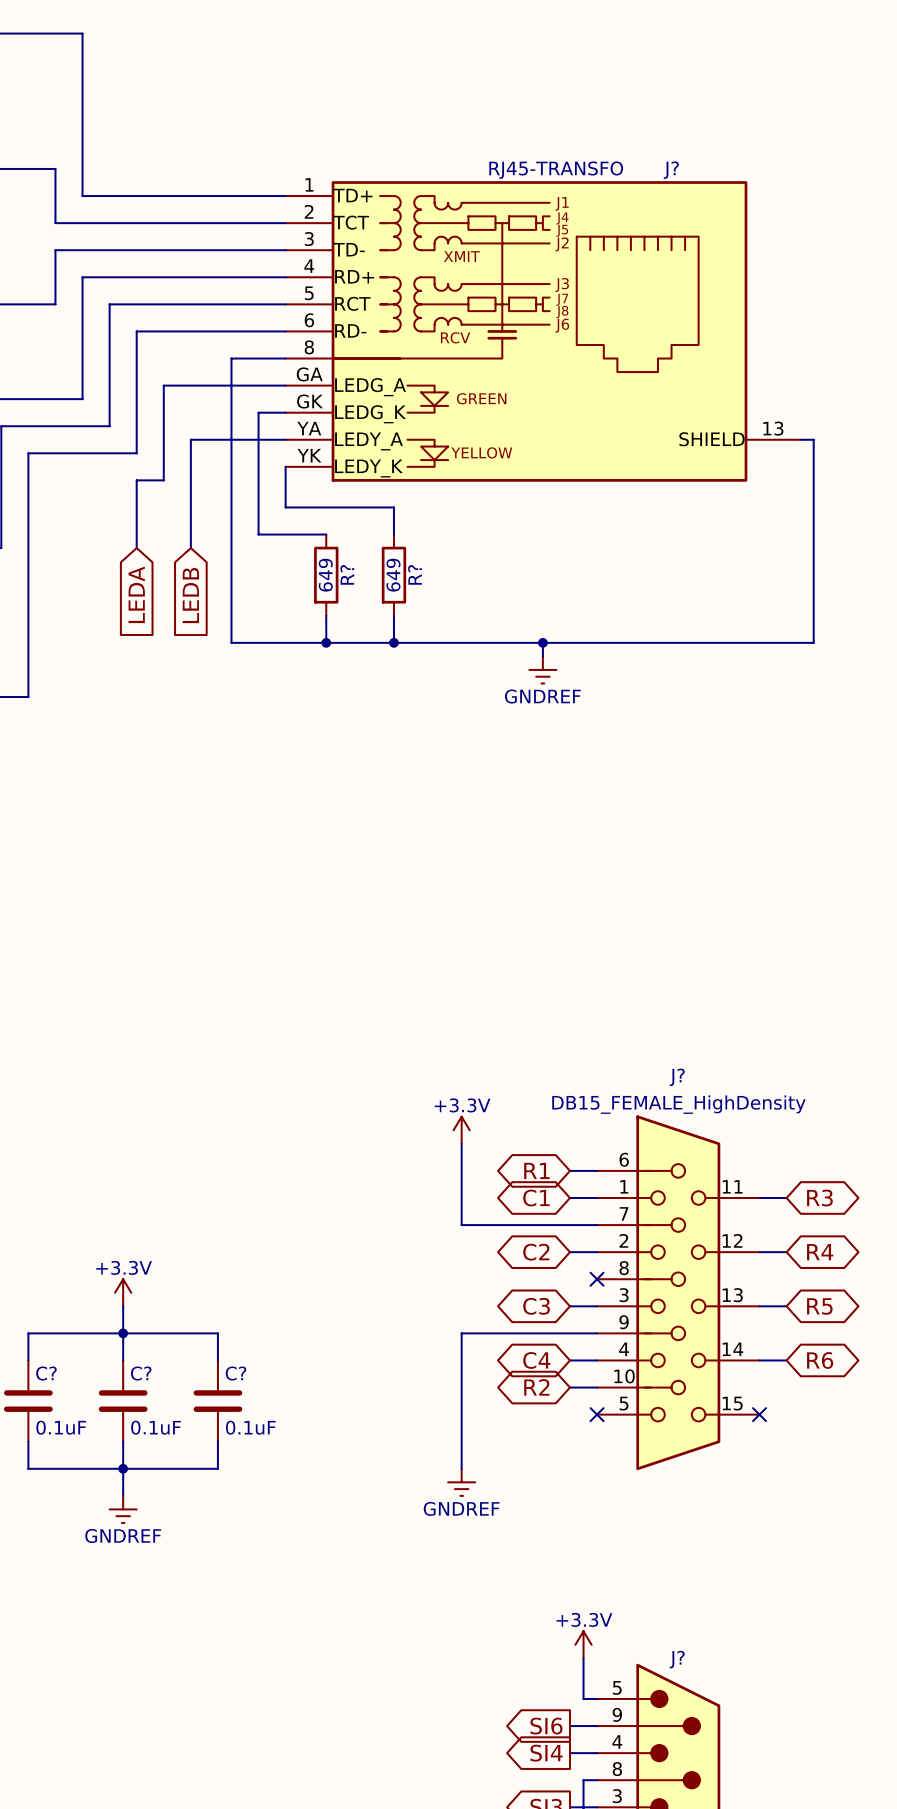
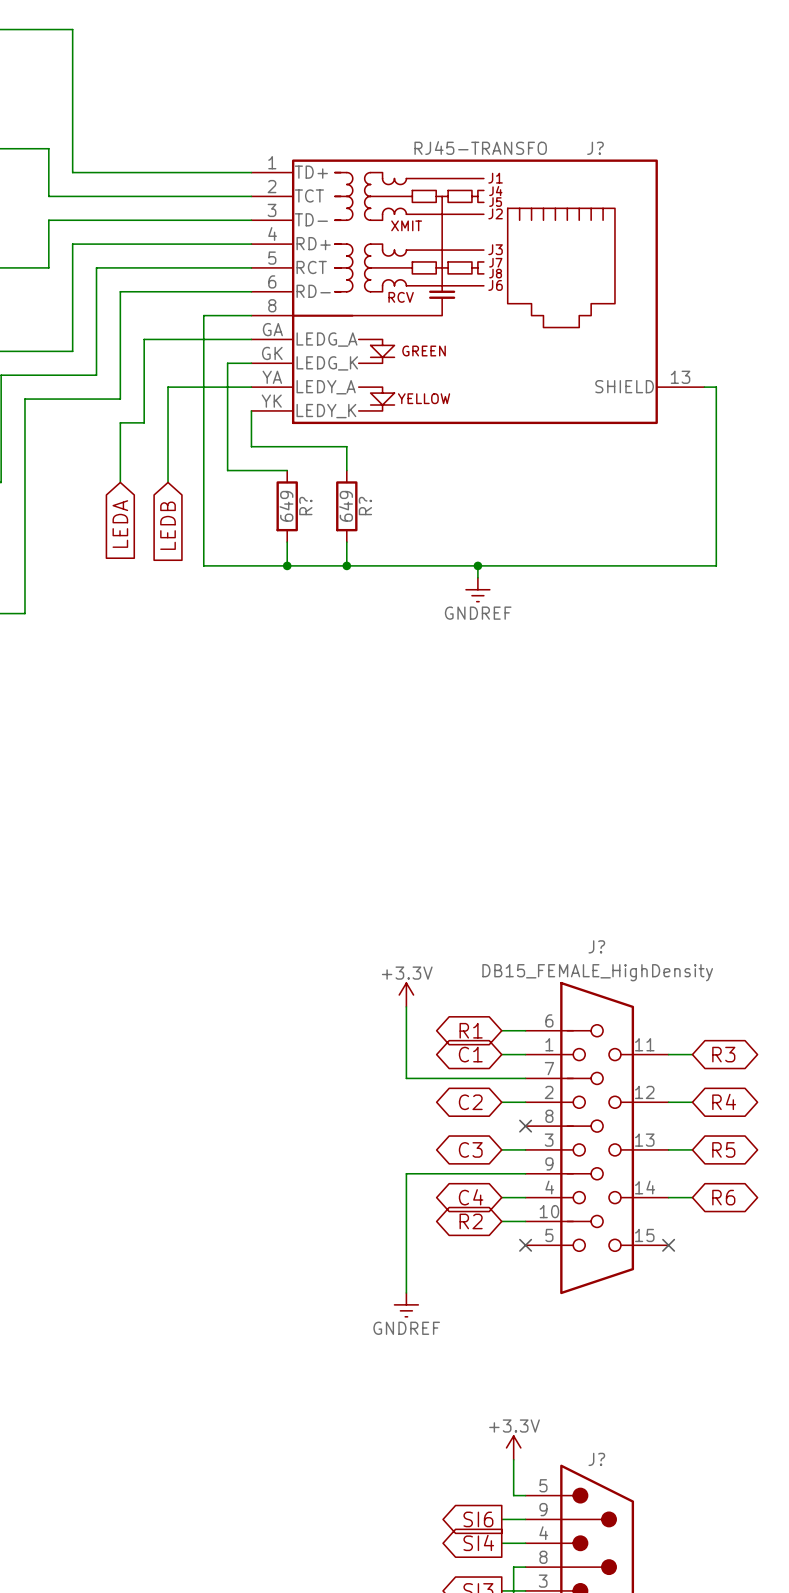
power symbol: +3.3V (123, 1292) -> none
wire: (123, 1306) (123, 1360) -> none
junction: (123, 1333) -> none
wire: (28, 1360) (28, 1333) (217, 1333) (217, 1360) -> none
C?: 0.1uF (28, 1401) -> none
C?: 0.1uF (123, 1401) -> none
C?: 0.1uF (217, 1401) -> none
wire: (28, 1441) (28, 1468) (217, 1468) (217, 1441) -> none
wire: (123, 1441) (123, 1495) -> none
junction: (123, 1468) -> none
power symbol: GNDREF (123, 1509) -> none

